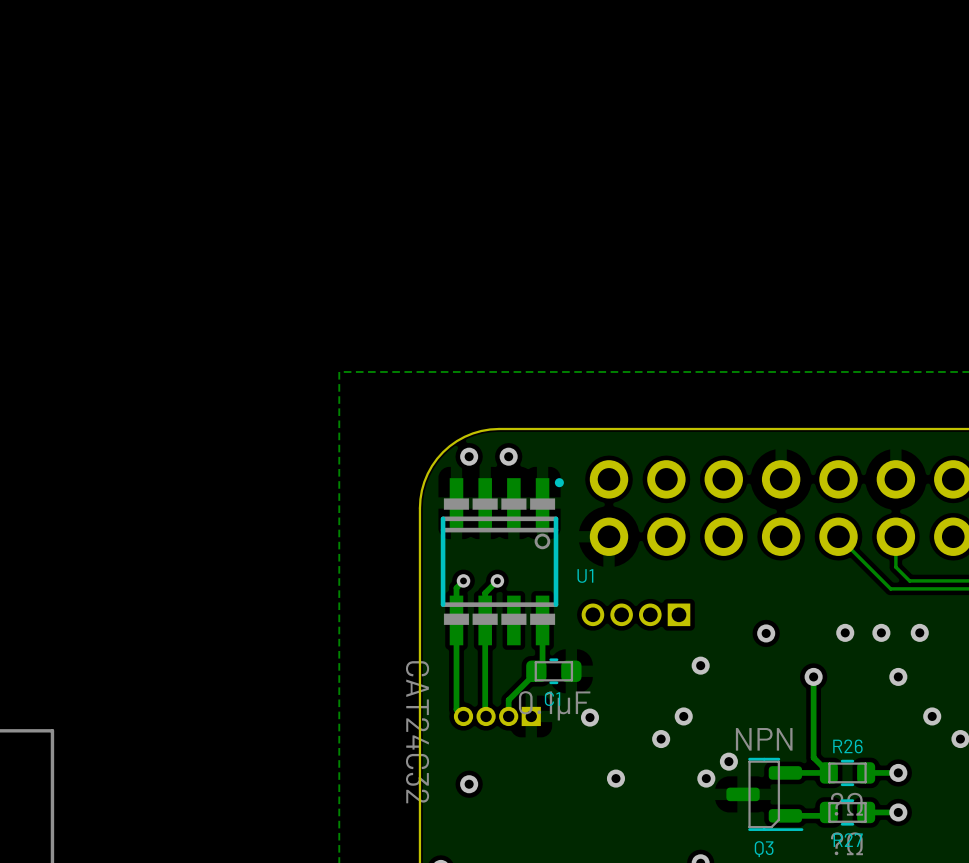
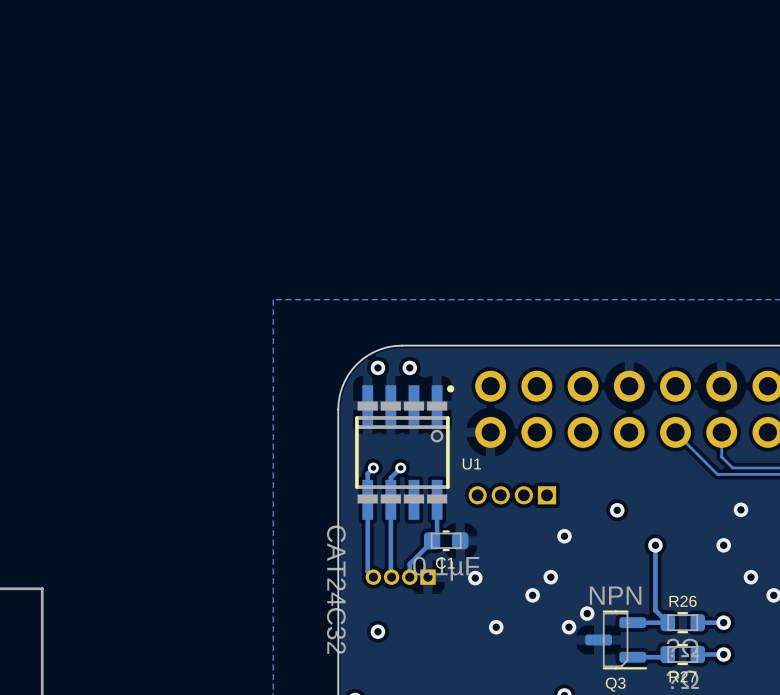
via: (845, 632) -> none
via: (881, 632) -> none

